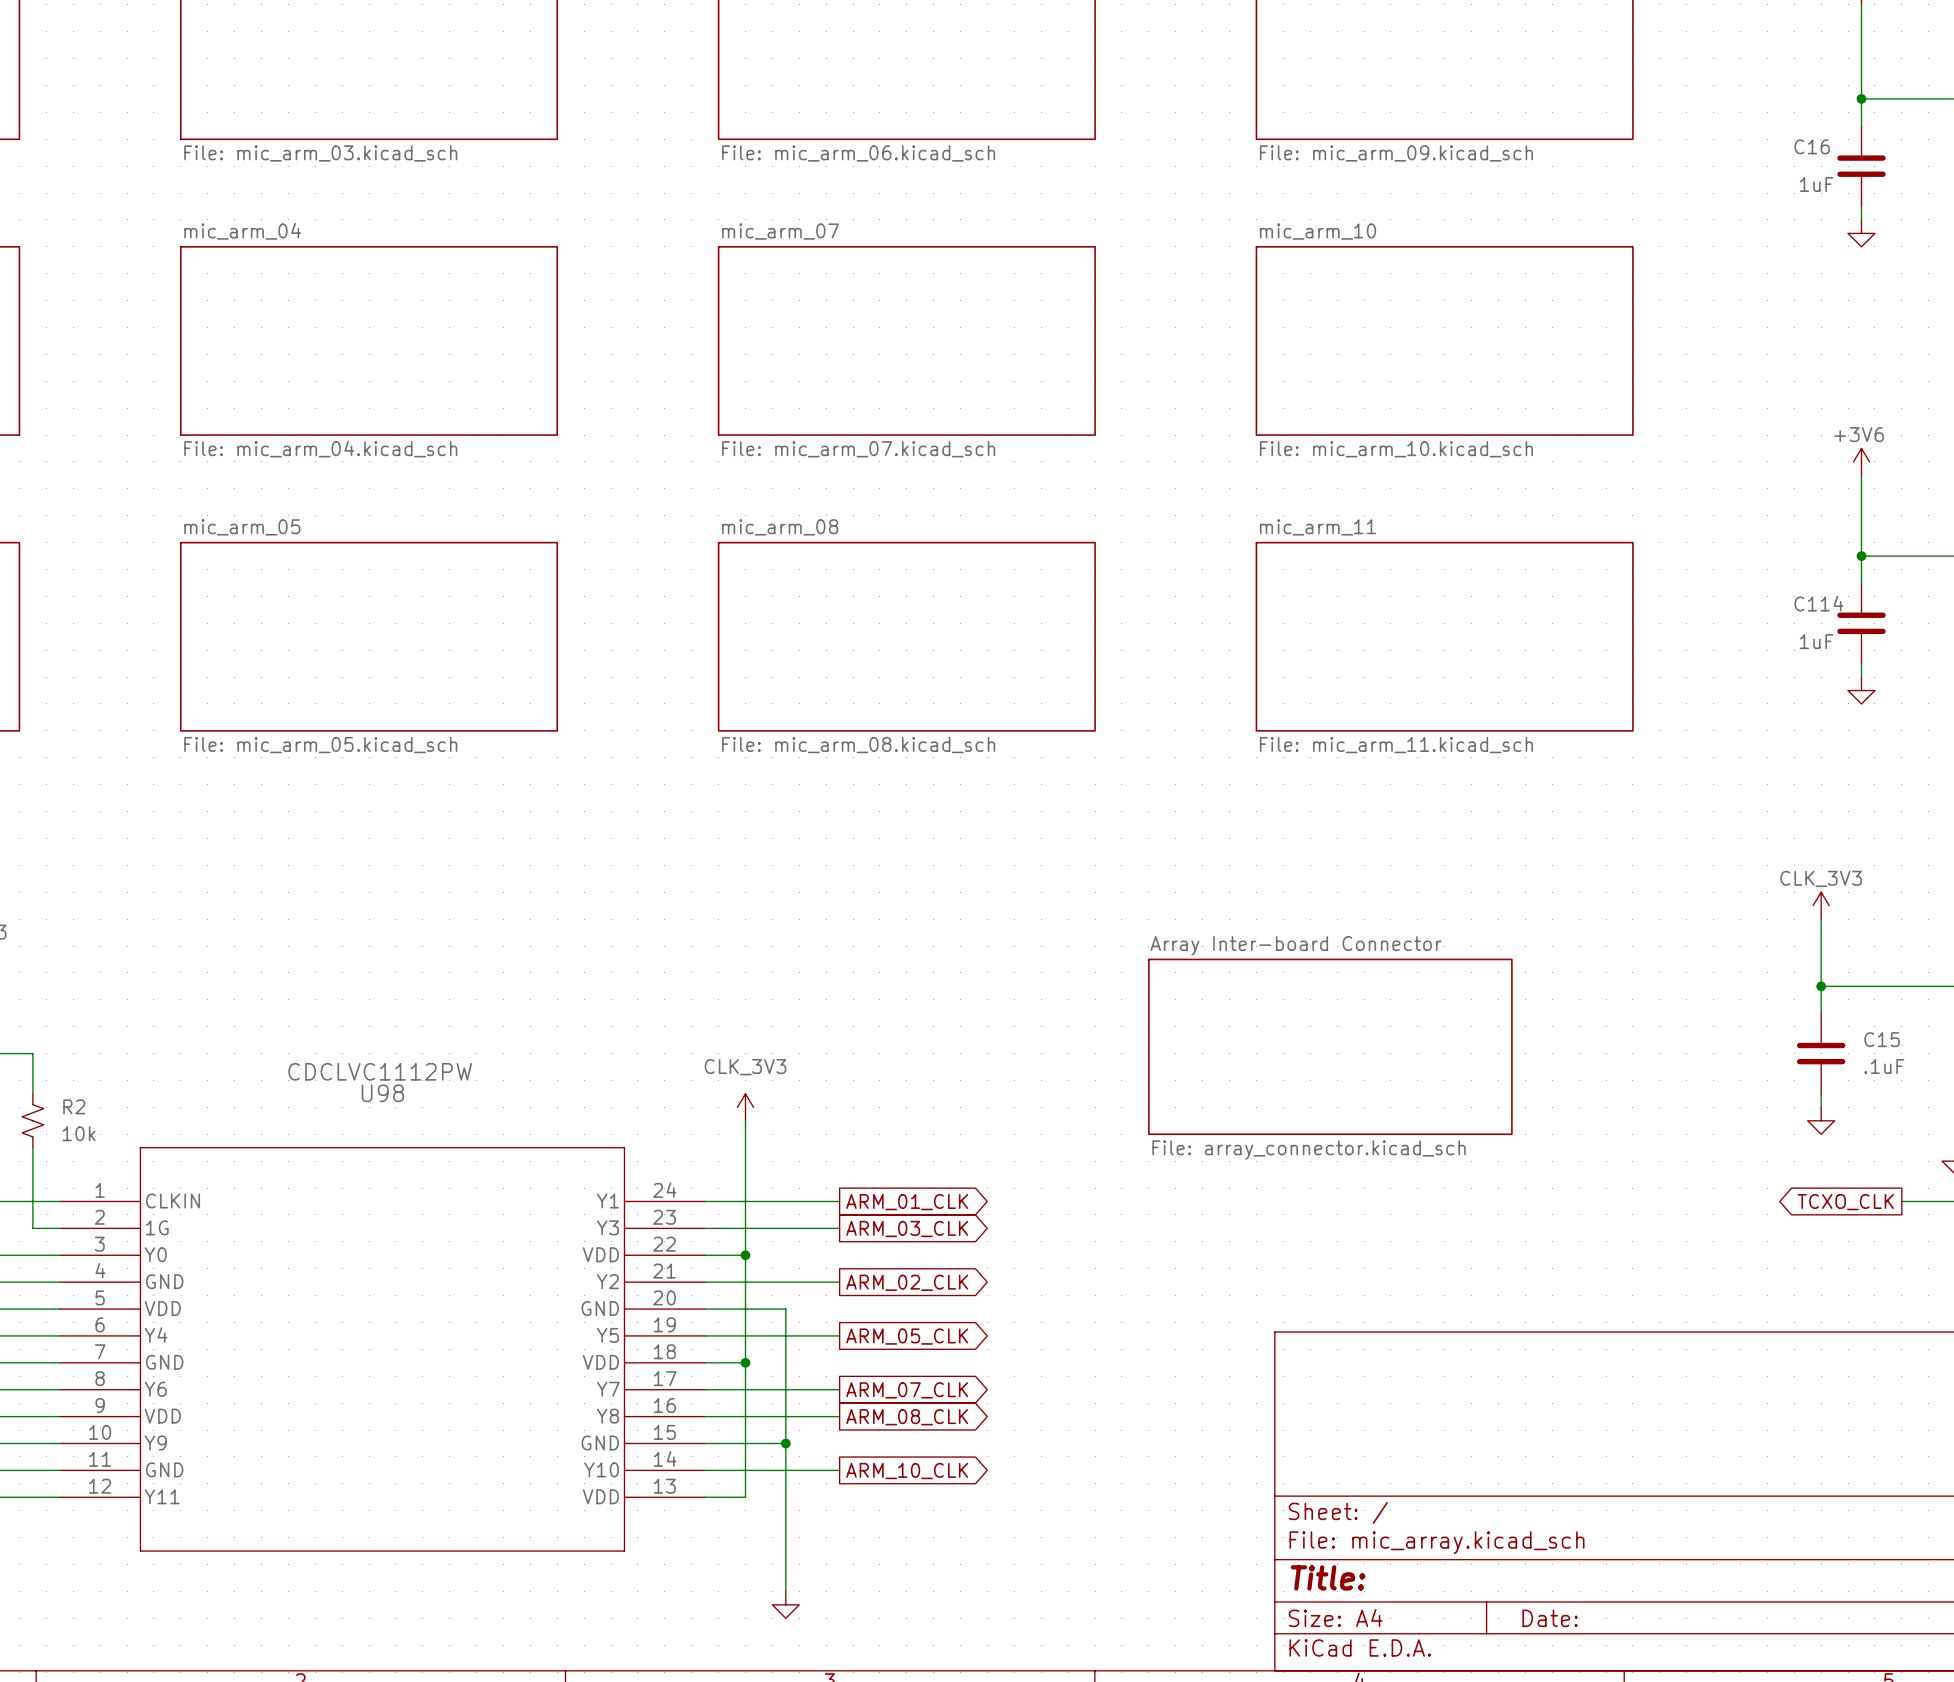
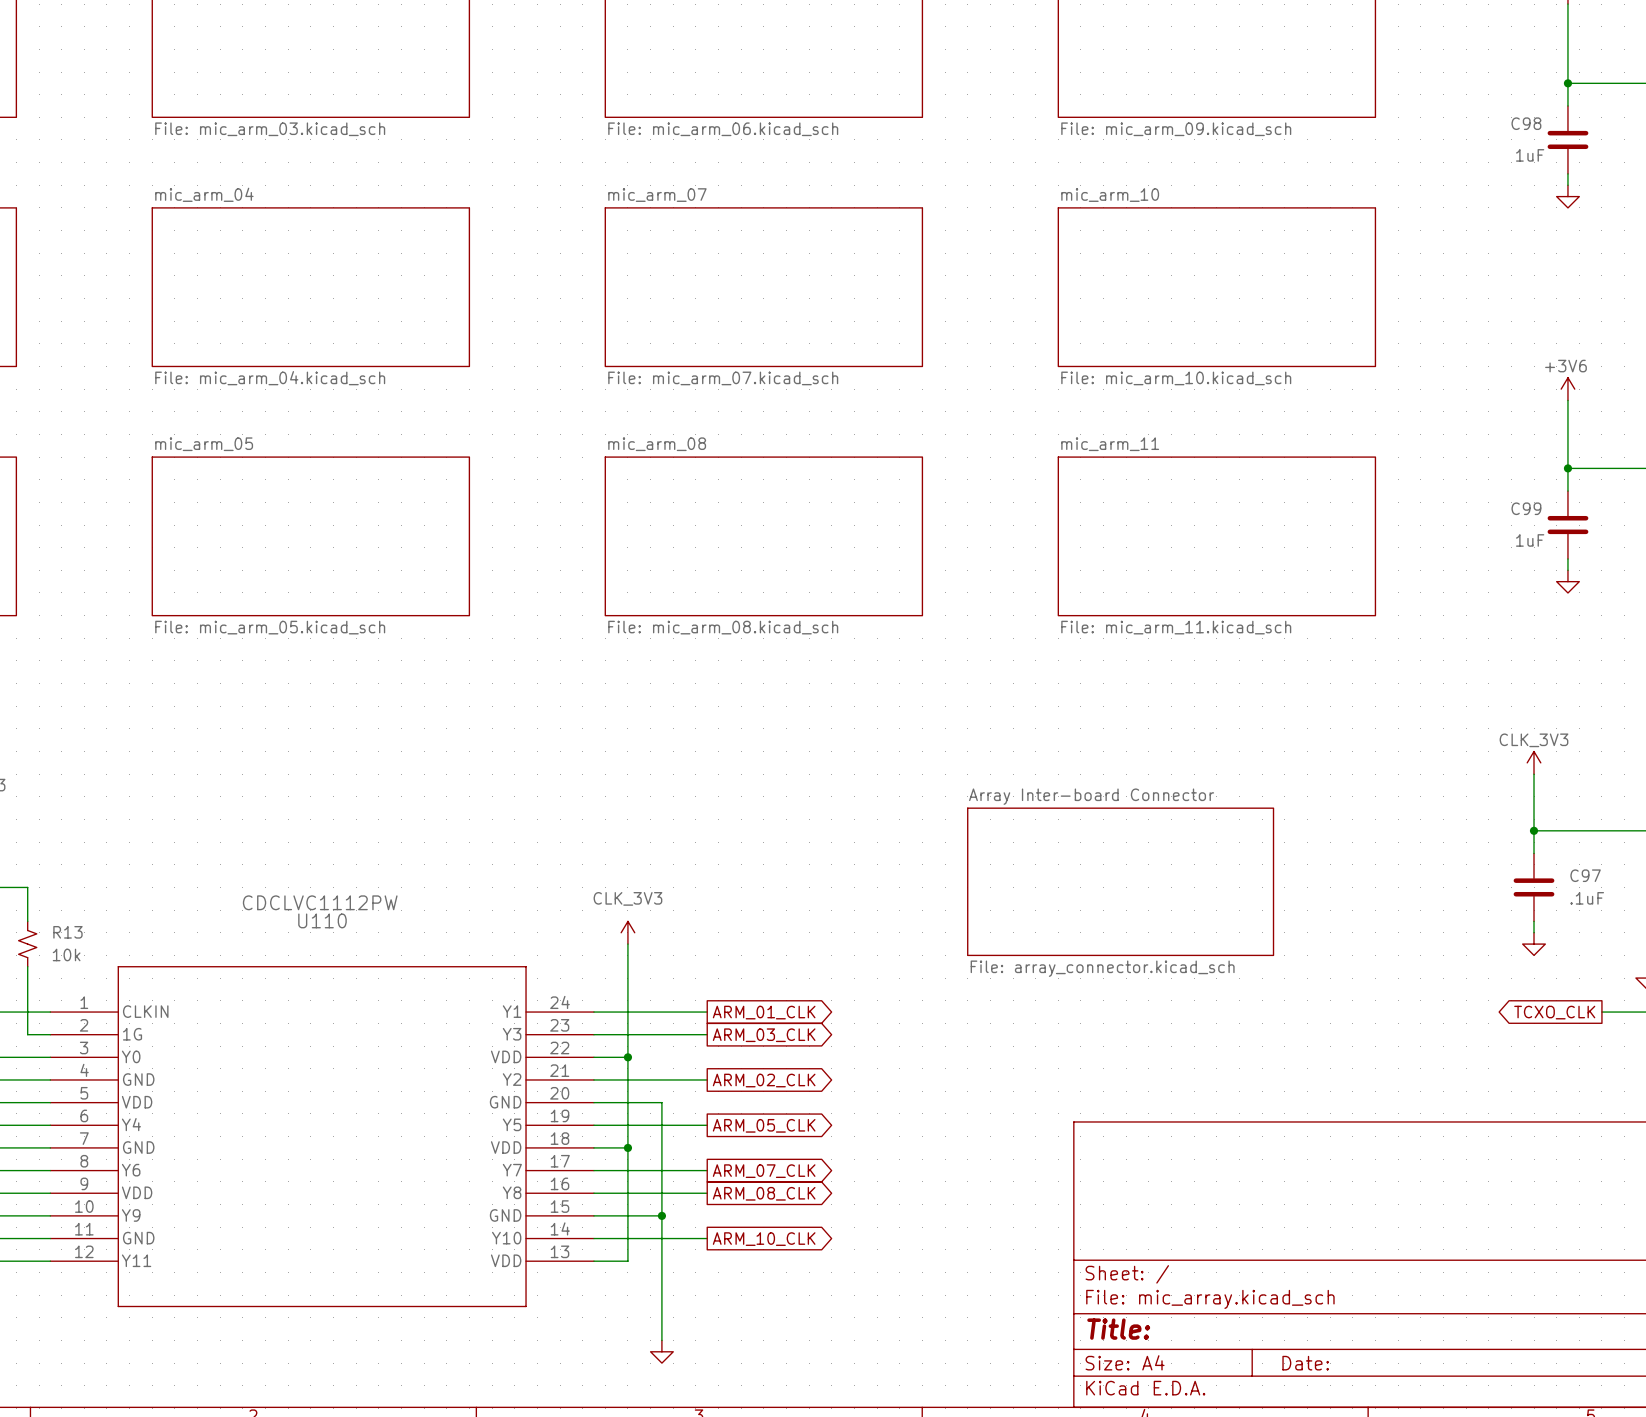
C16 name: C16 (1812, 146) -> C98 (1526, 123)
C114 name: C114 (1818, 603) -> C99 (1526, 508)
C15 name: C15 (1882, 1039) -> C97 (1585, 875)
U98 name: U98 (382, 1093) -> U110 (322, 920)
R2 name: R2 (74, 1106) -> R13 (67, 932)

